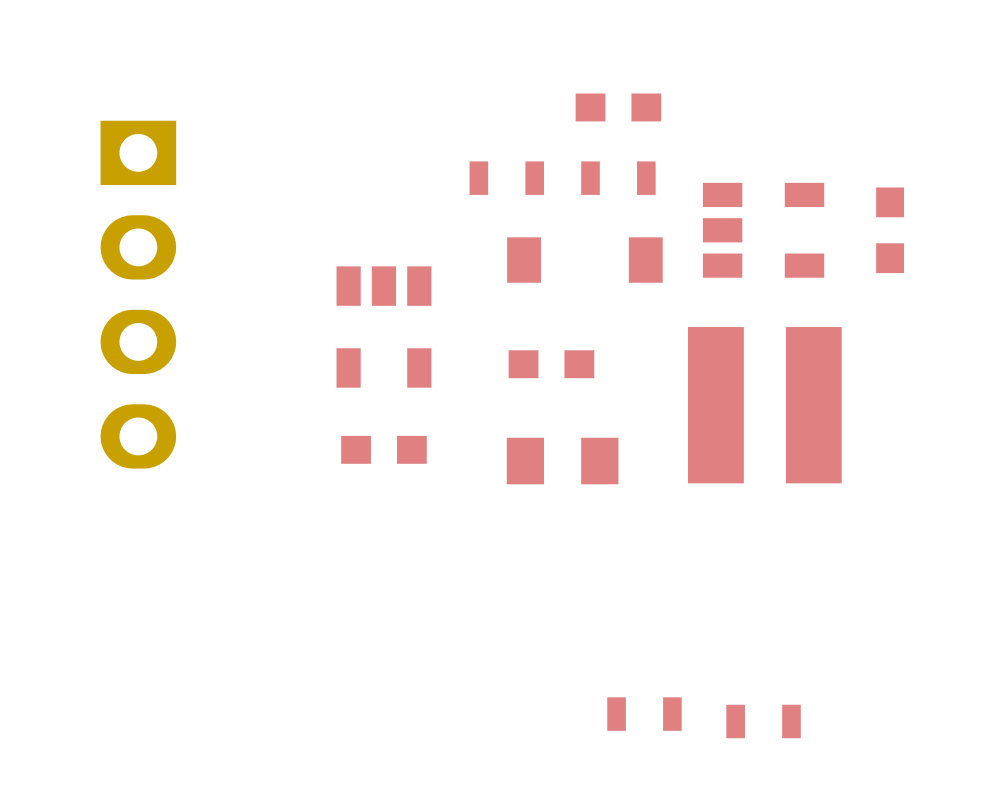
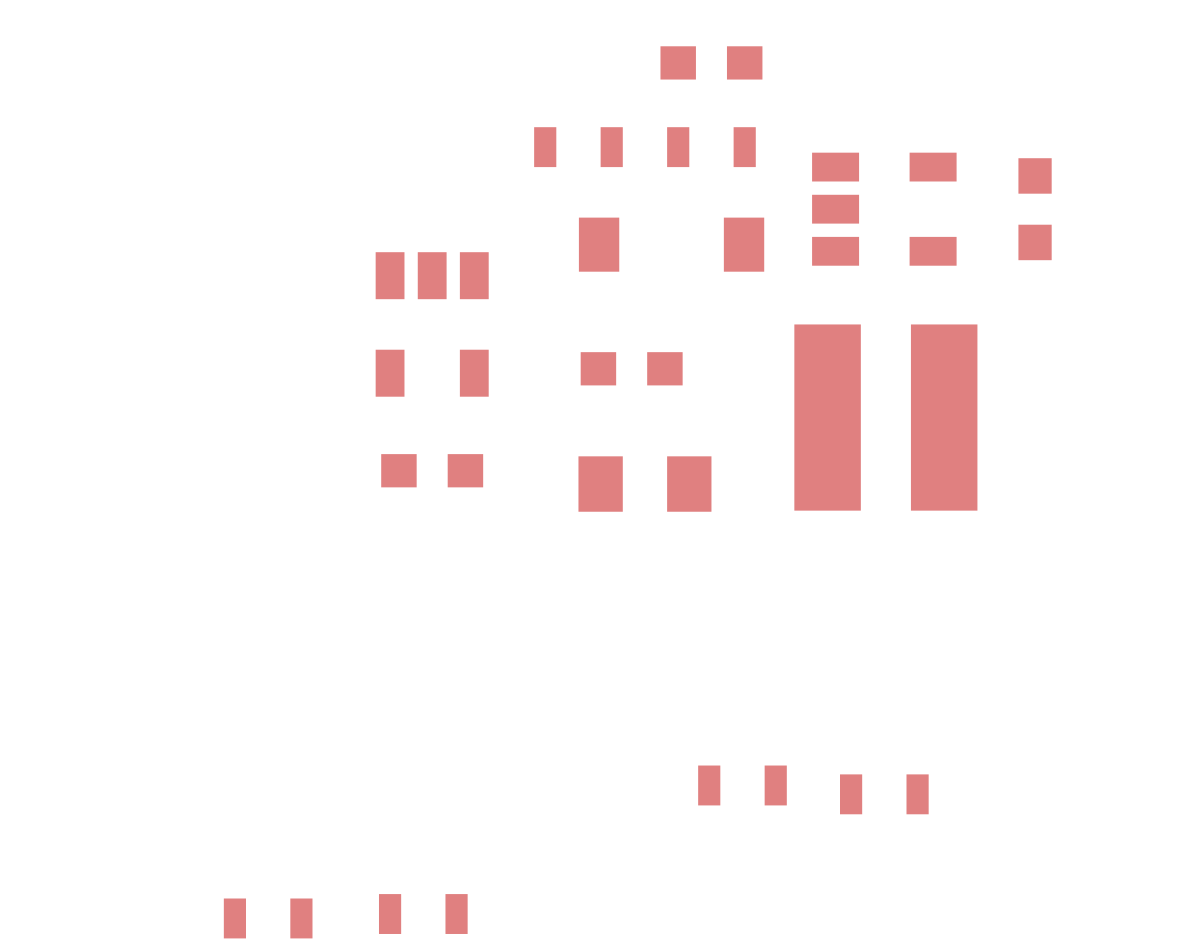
part: (138, 294) -> none

